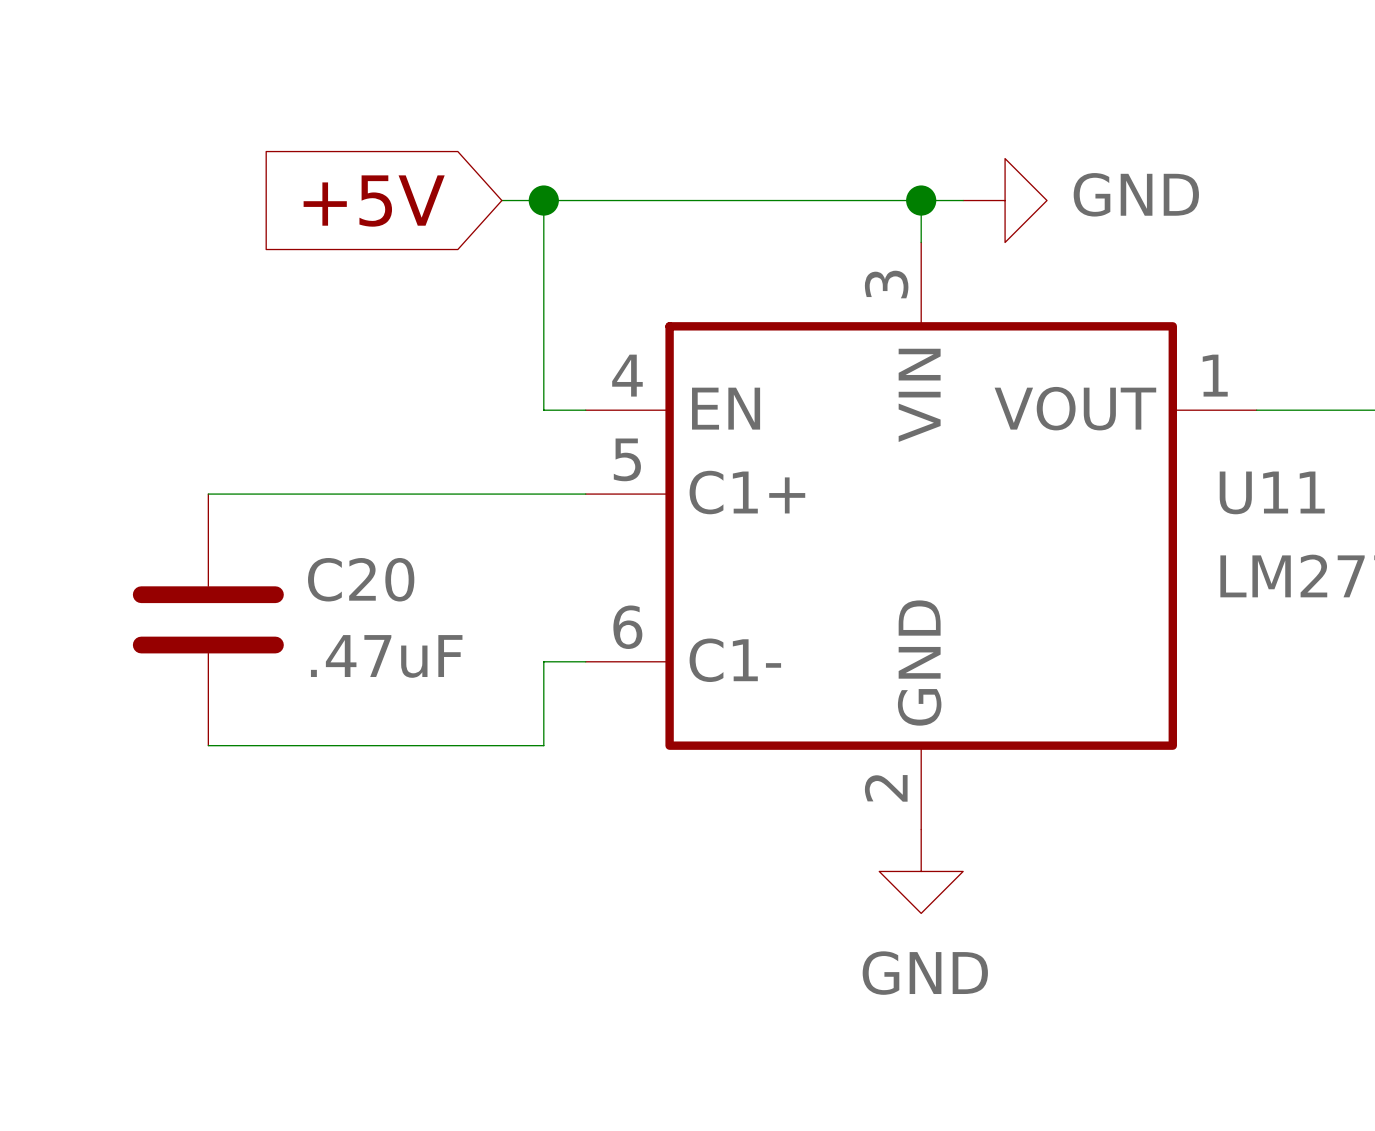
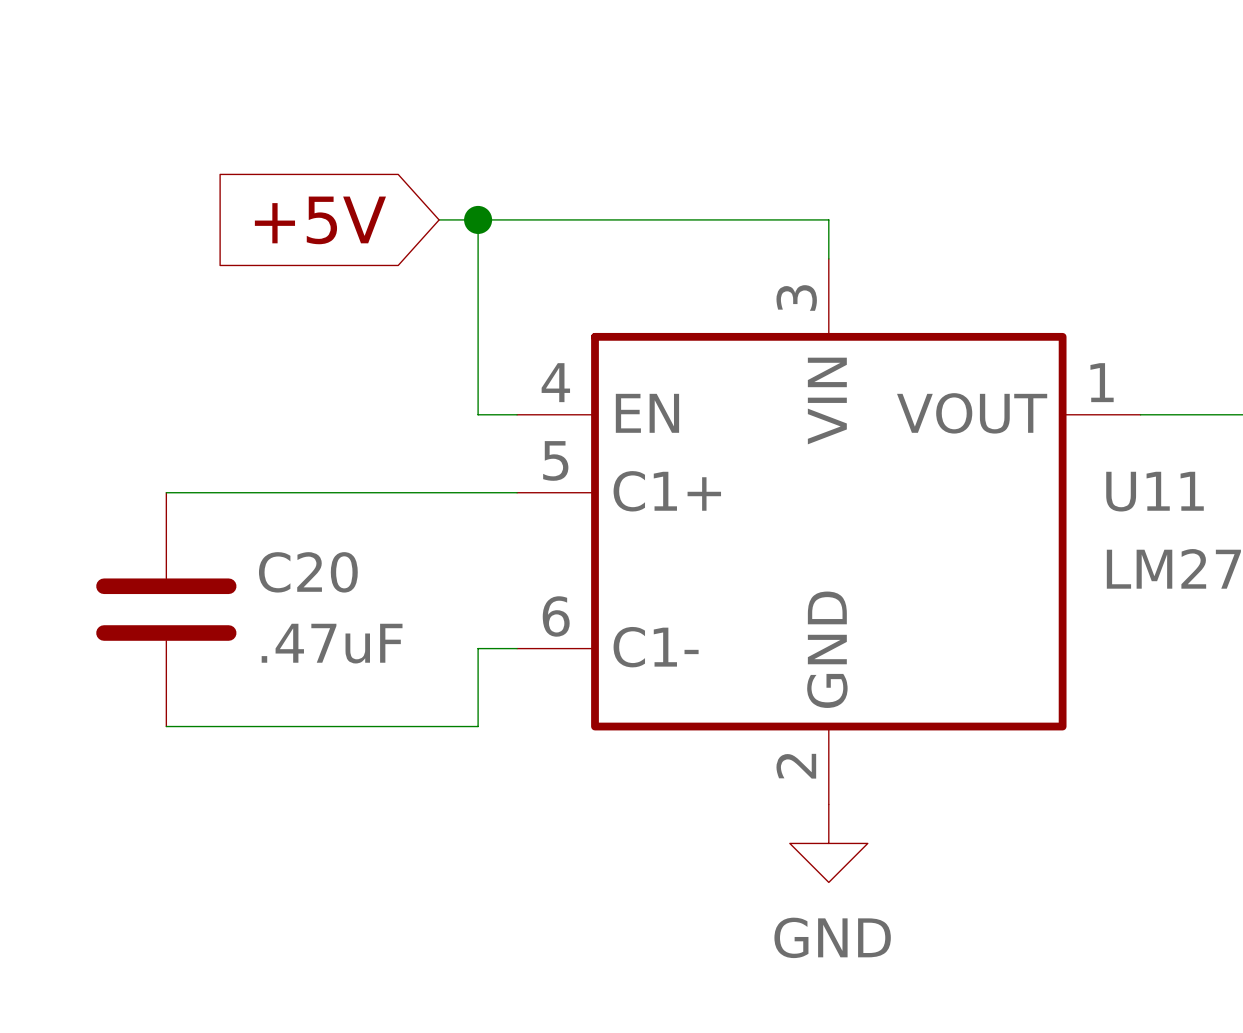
wire: (921, 200) (963, 200) -> none
junction: (921, 200) -> none
power symbol: GND (1005, 200) -> none

